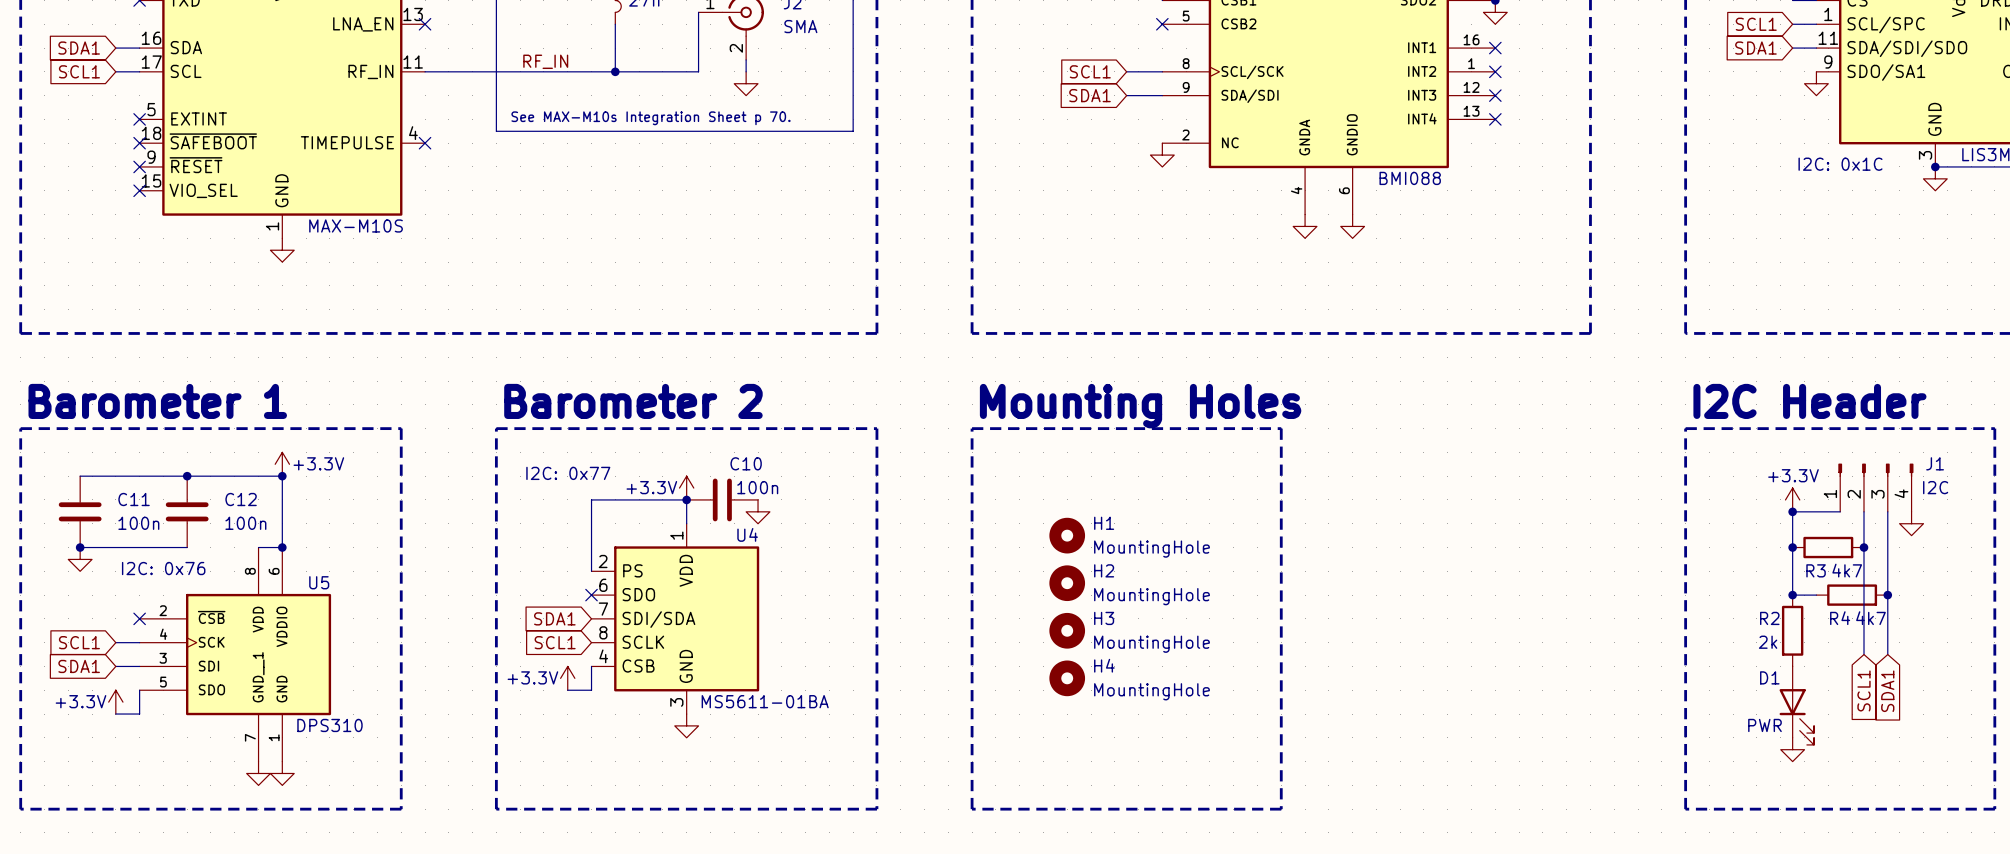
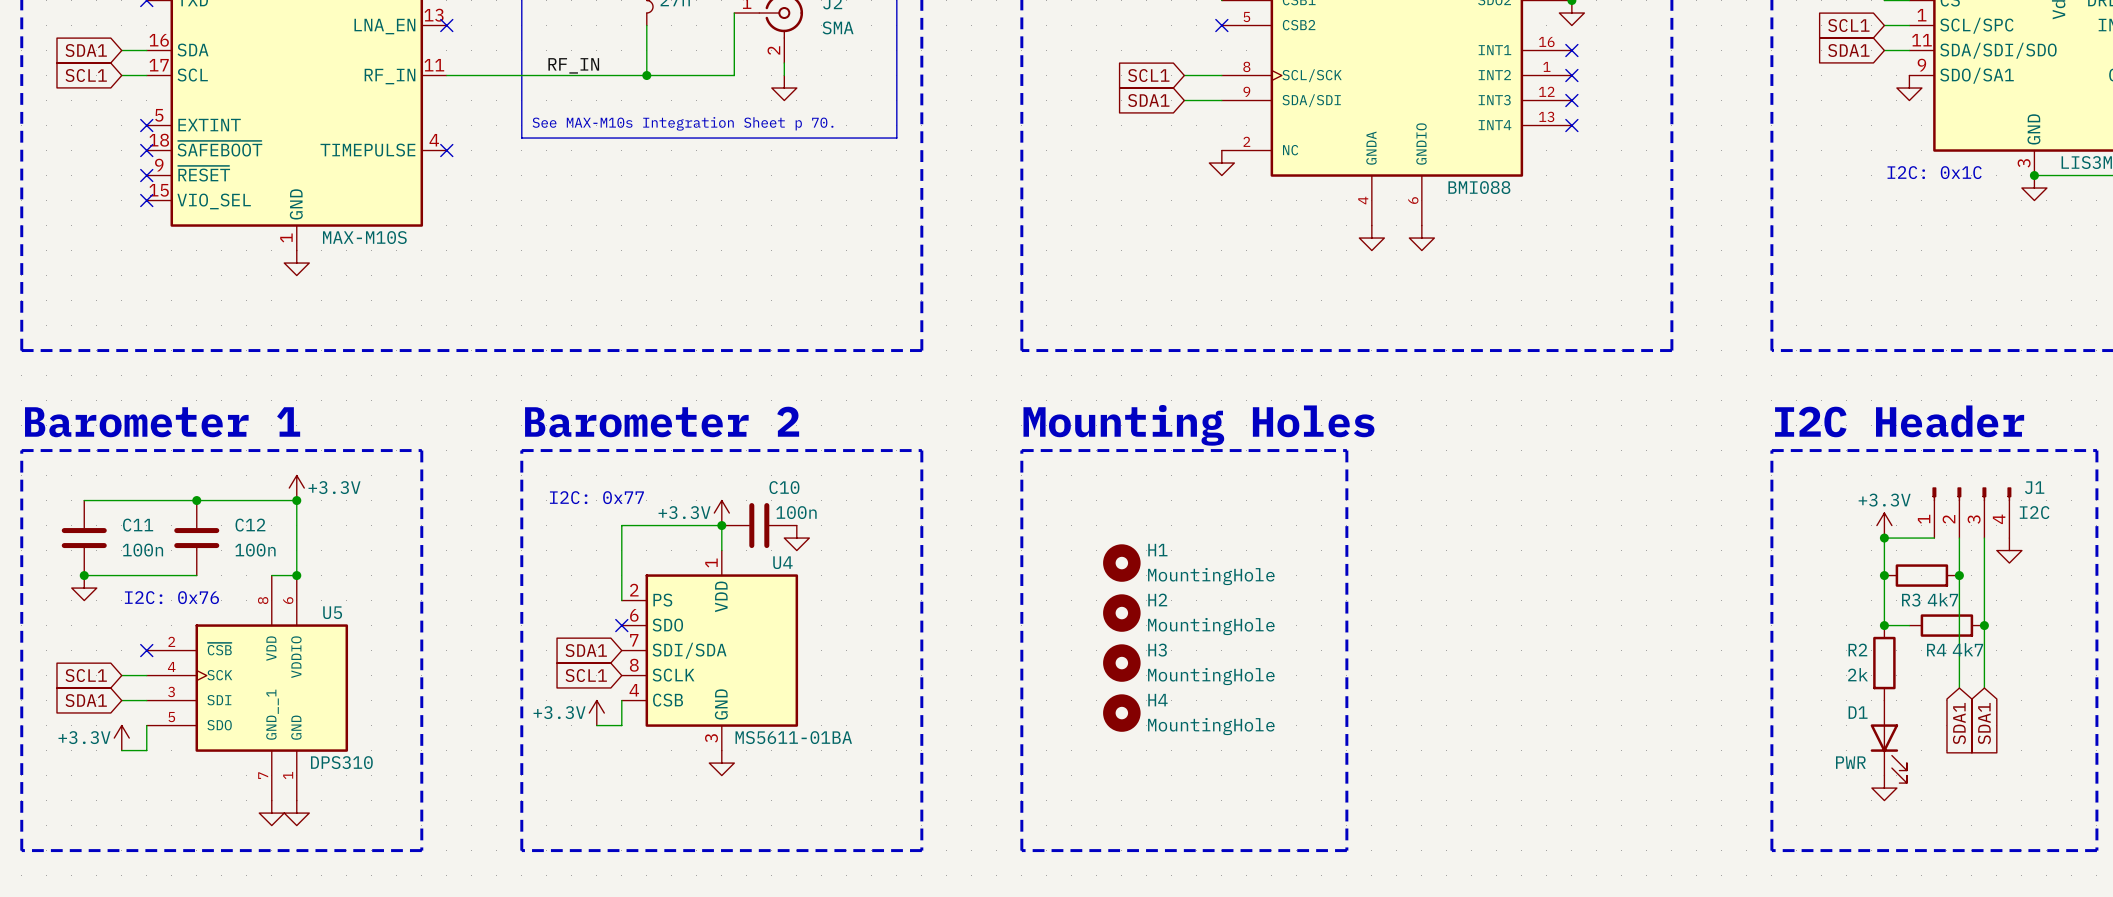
global label: SCL1 (1863, 690) -> SDA1 (1959, 723)

